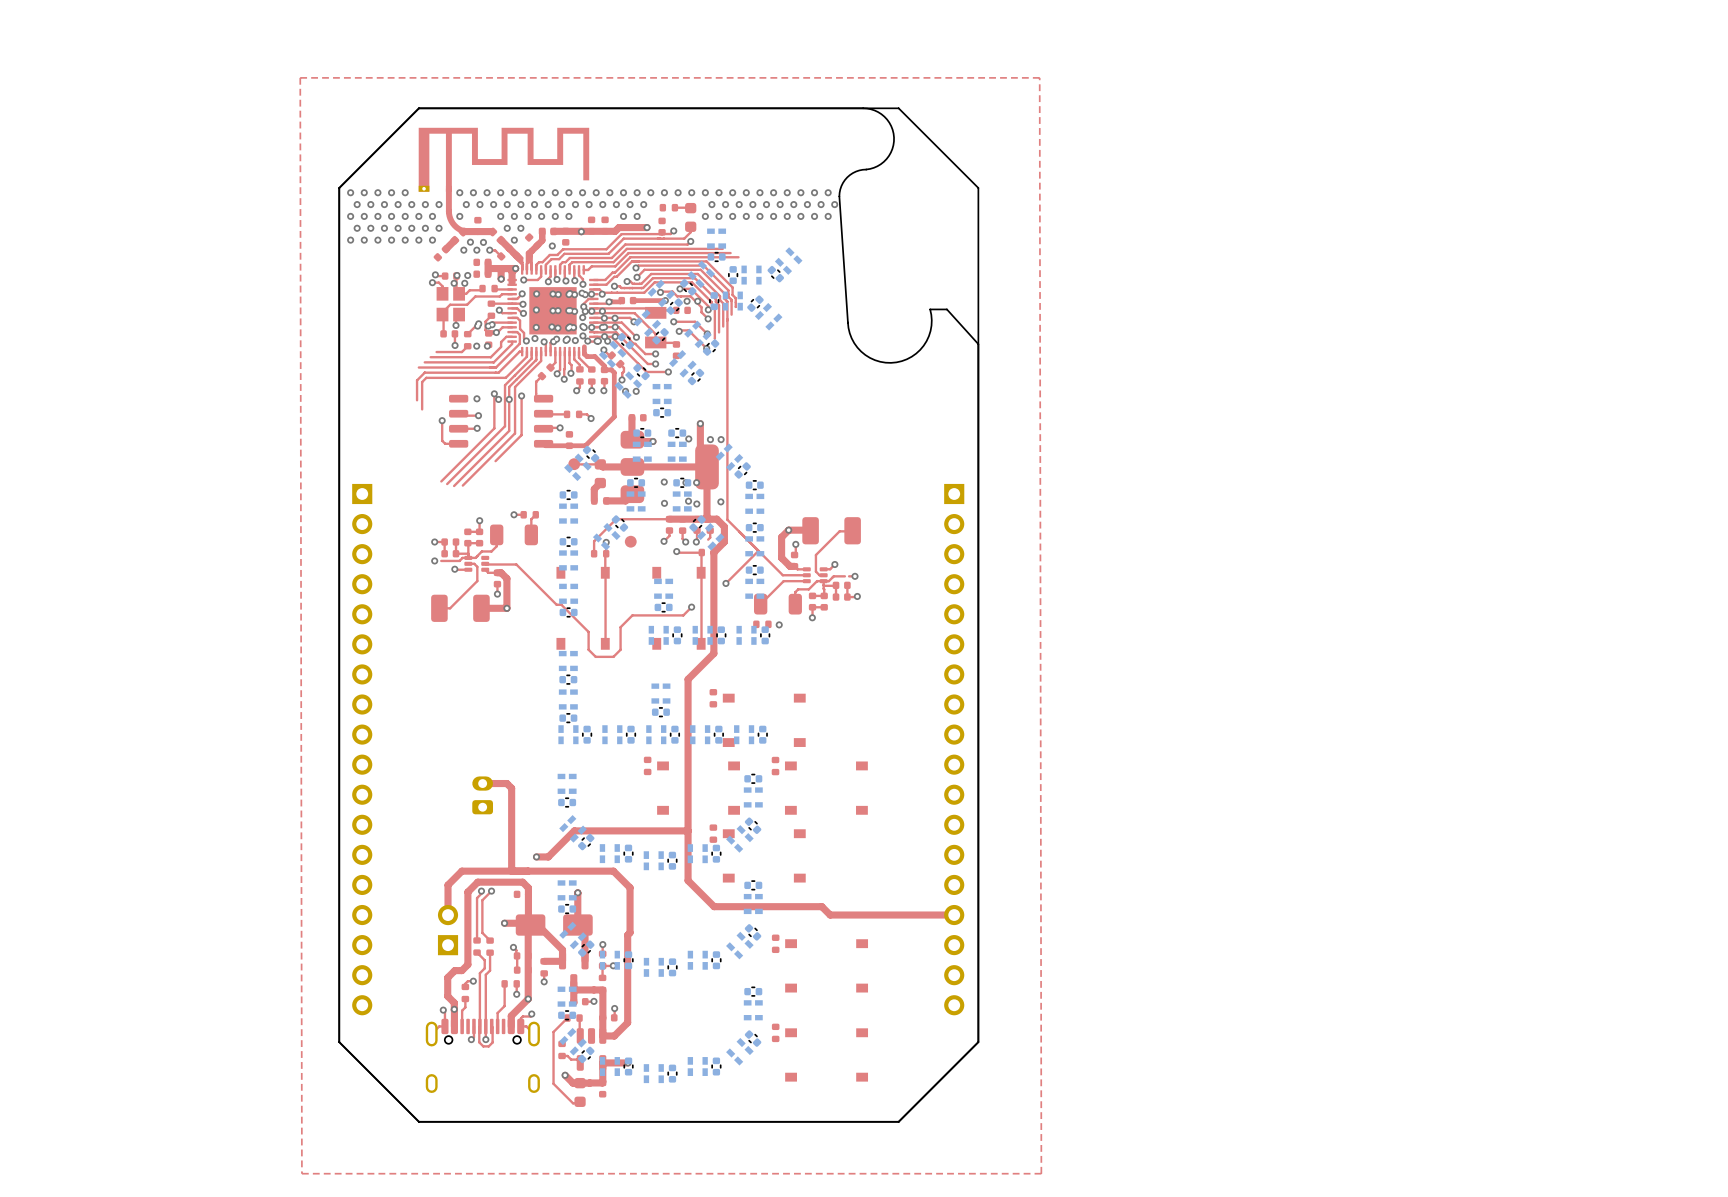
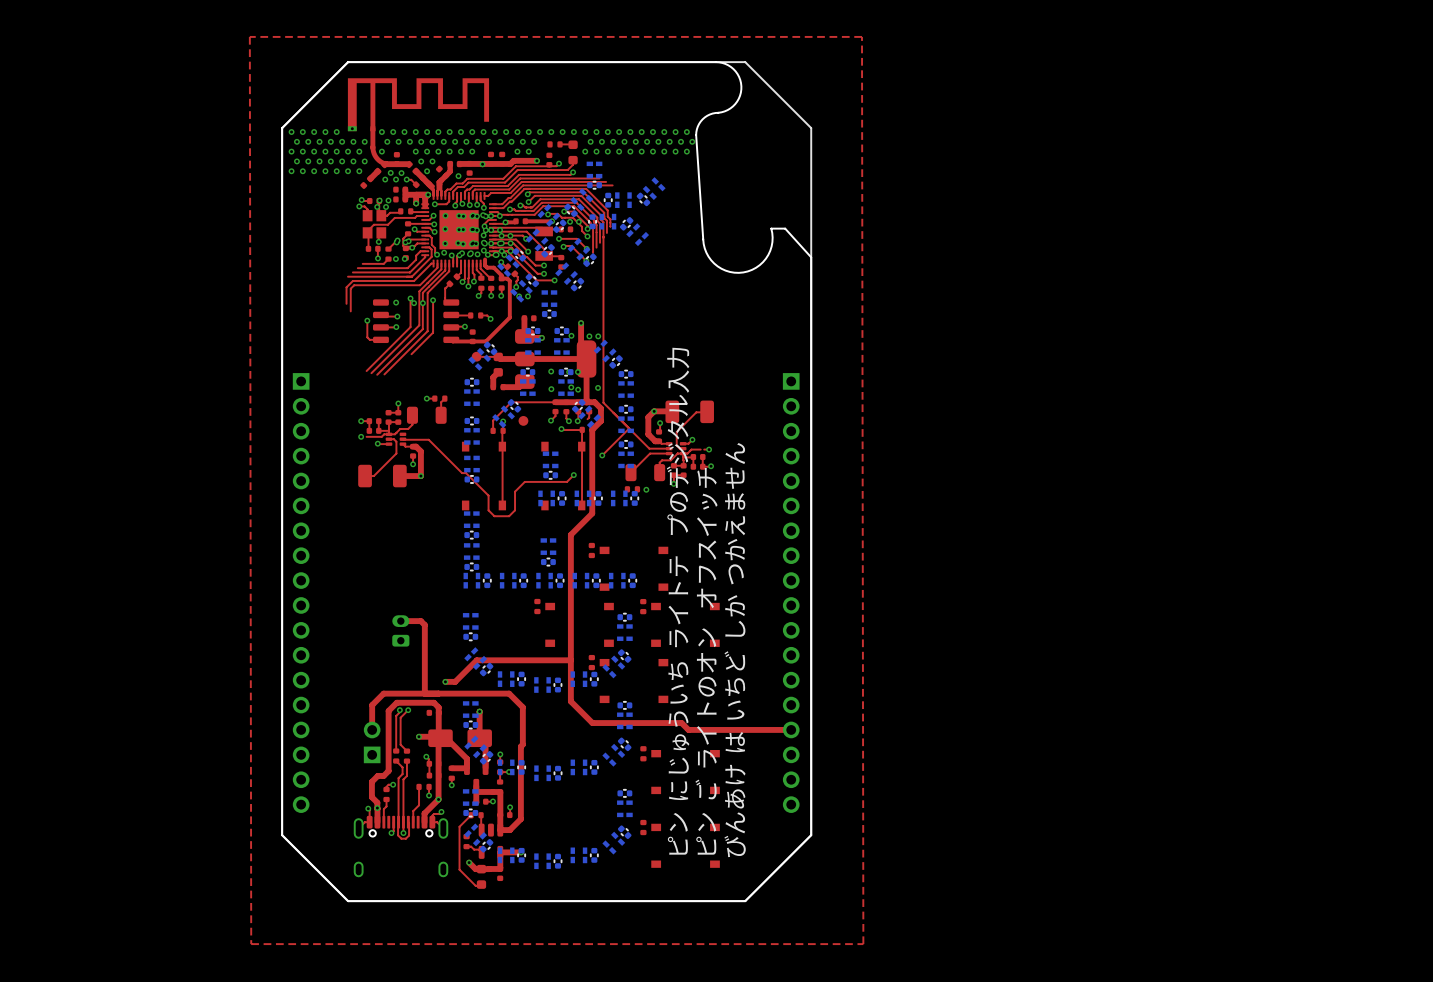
text: none -> ピン にじゅういち ライトテ プのデジタル入力 (678, 601)
text: none -> びんあけ は いちど しか つかえません (735, 650)
text: none -> ピン ご ライトのオン オフスイッチ (706, 661)

